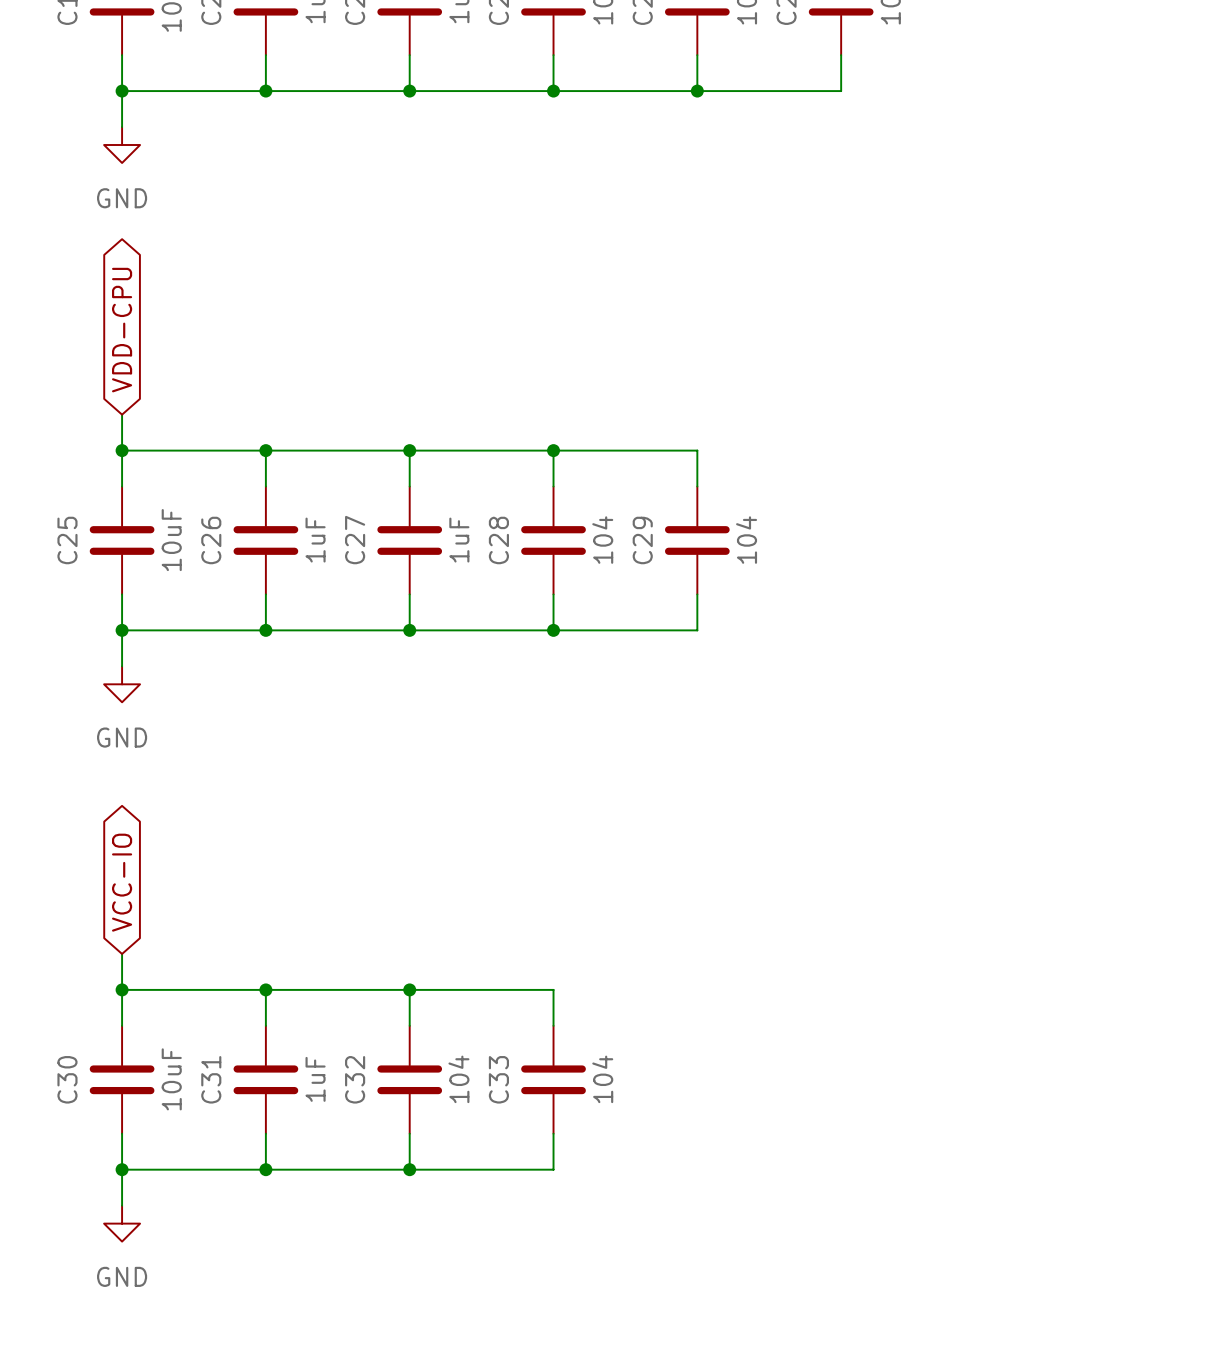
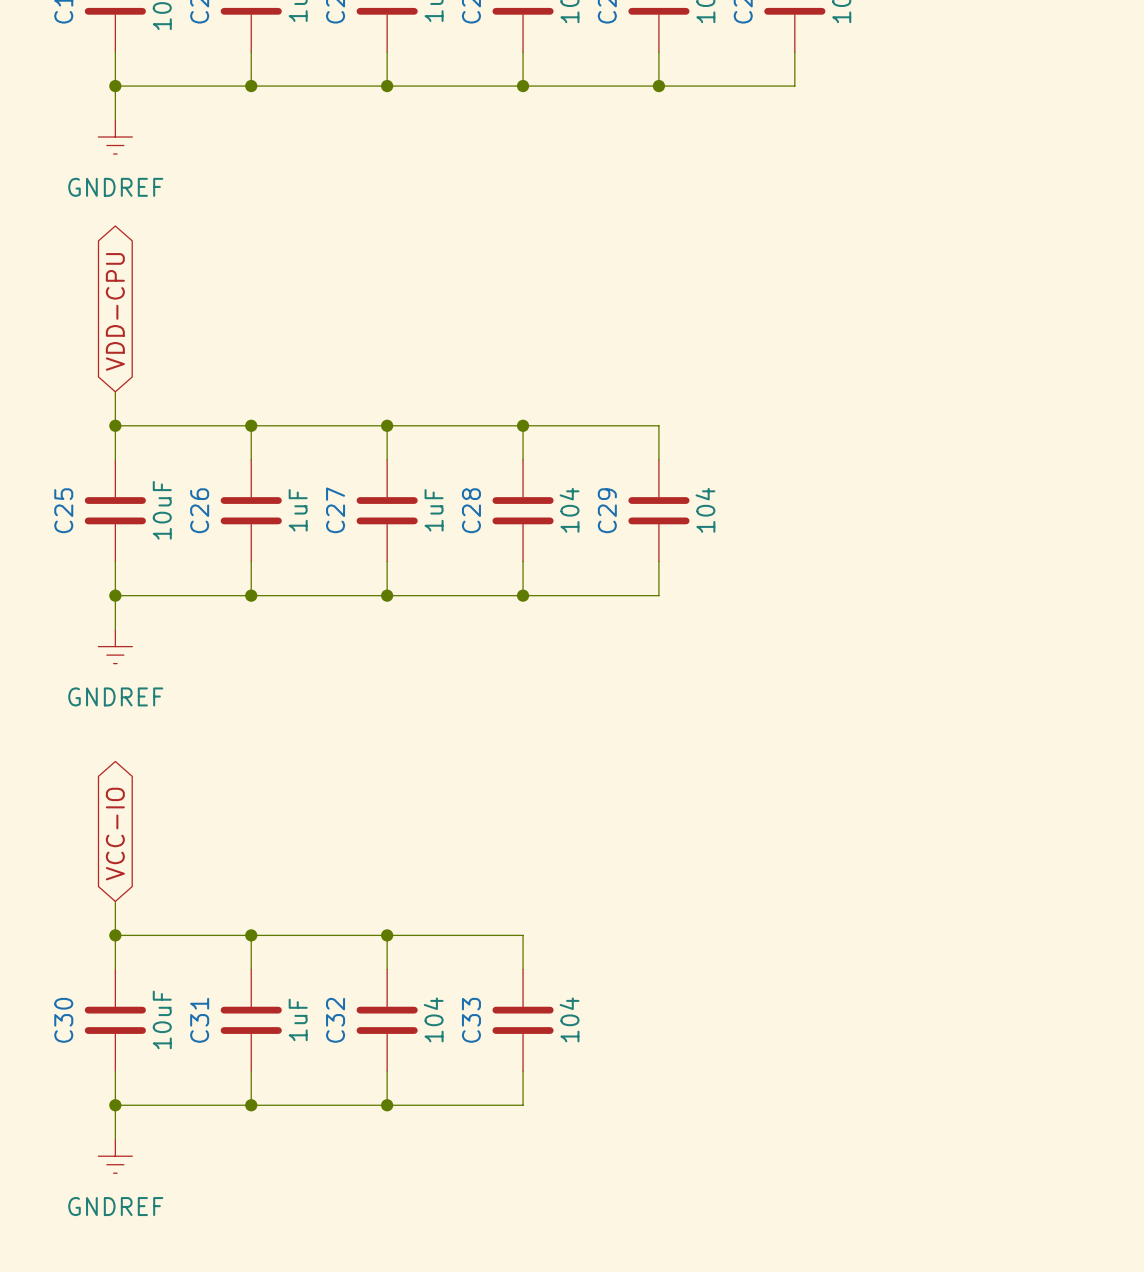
power symbol: GND (122, 145) -> GNDREF (115, 137)
power symbol: GND (122, 684) -> GNDREF (115, 646)
power symbol: GND (122, 1223) -> GNDREF (115, 1156)

